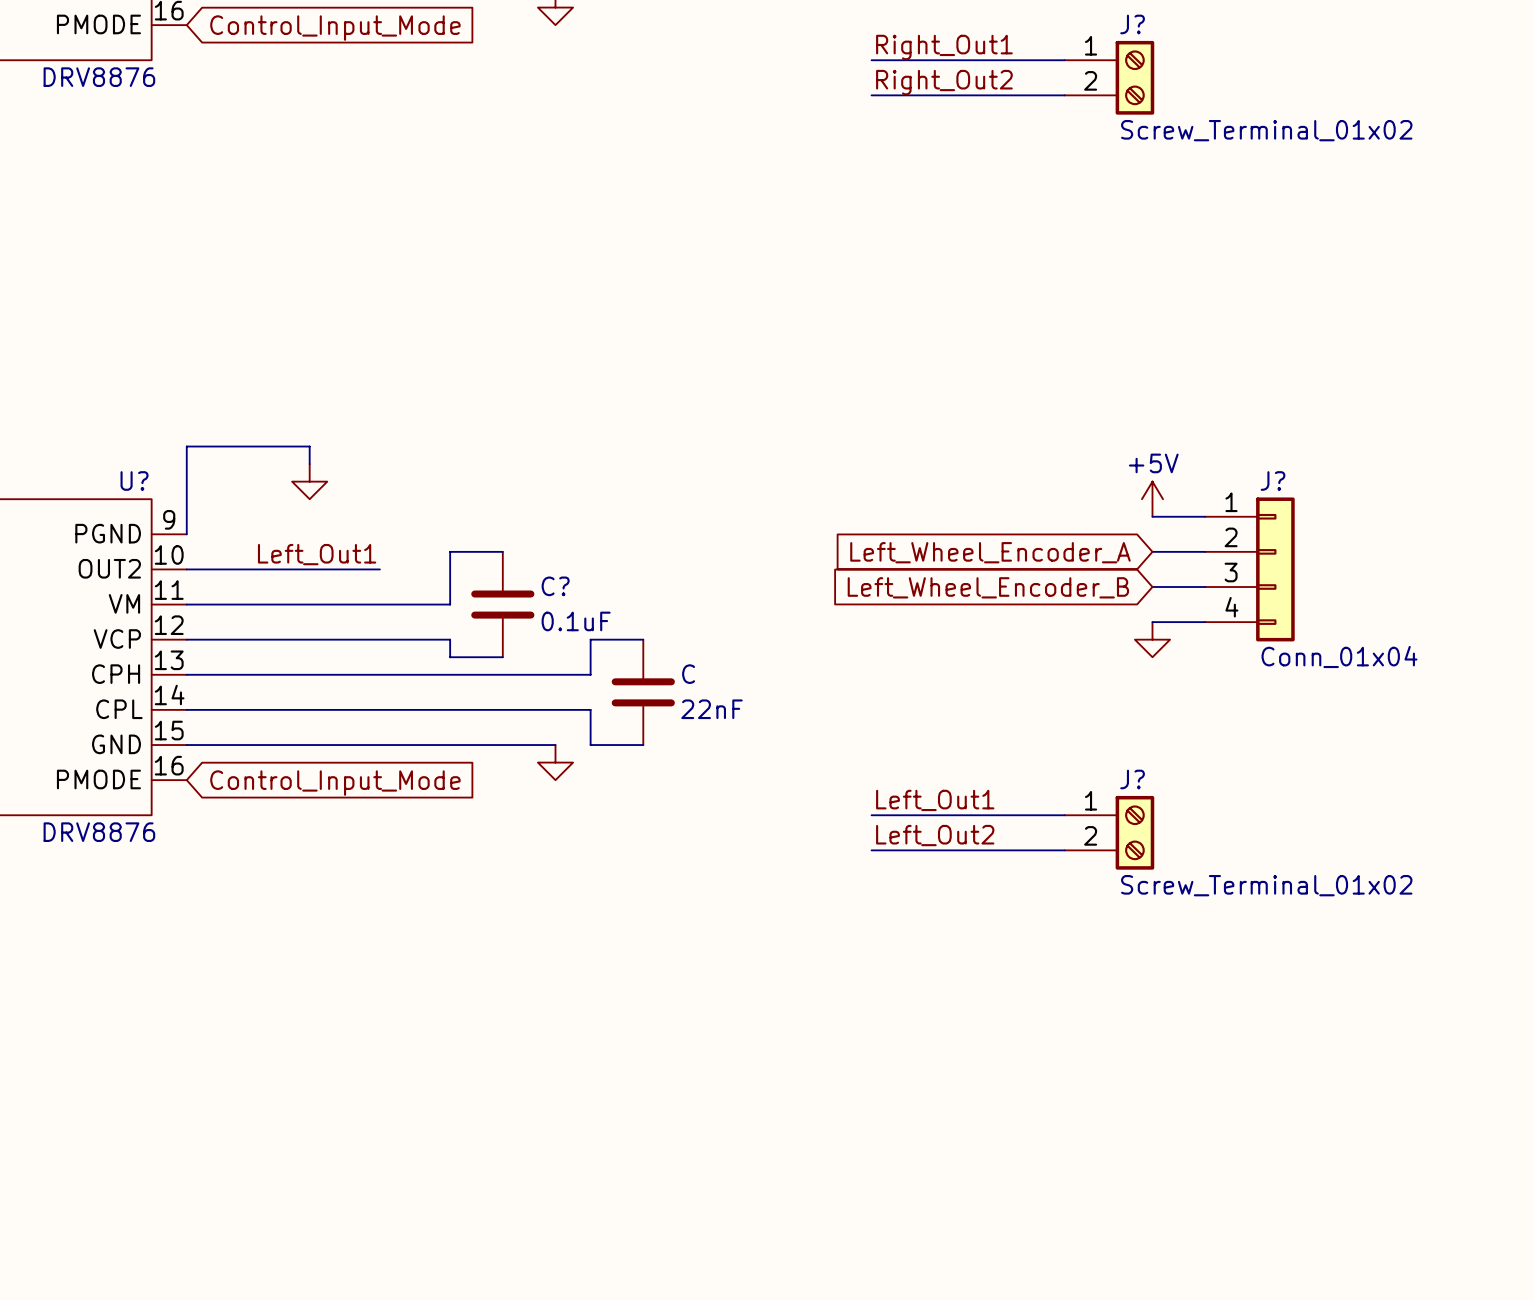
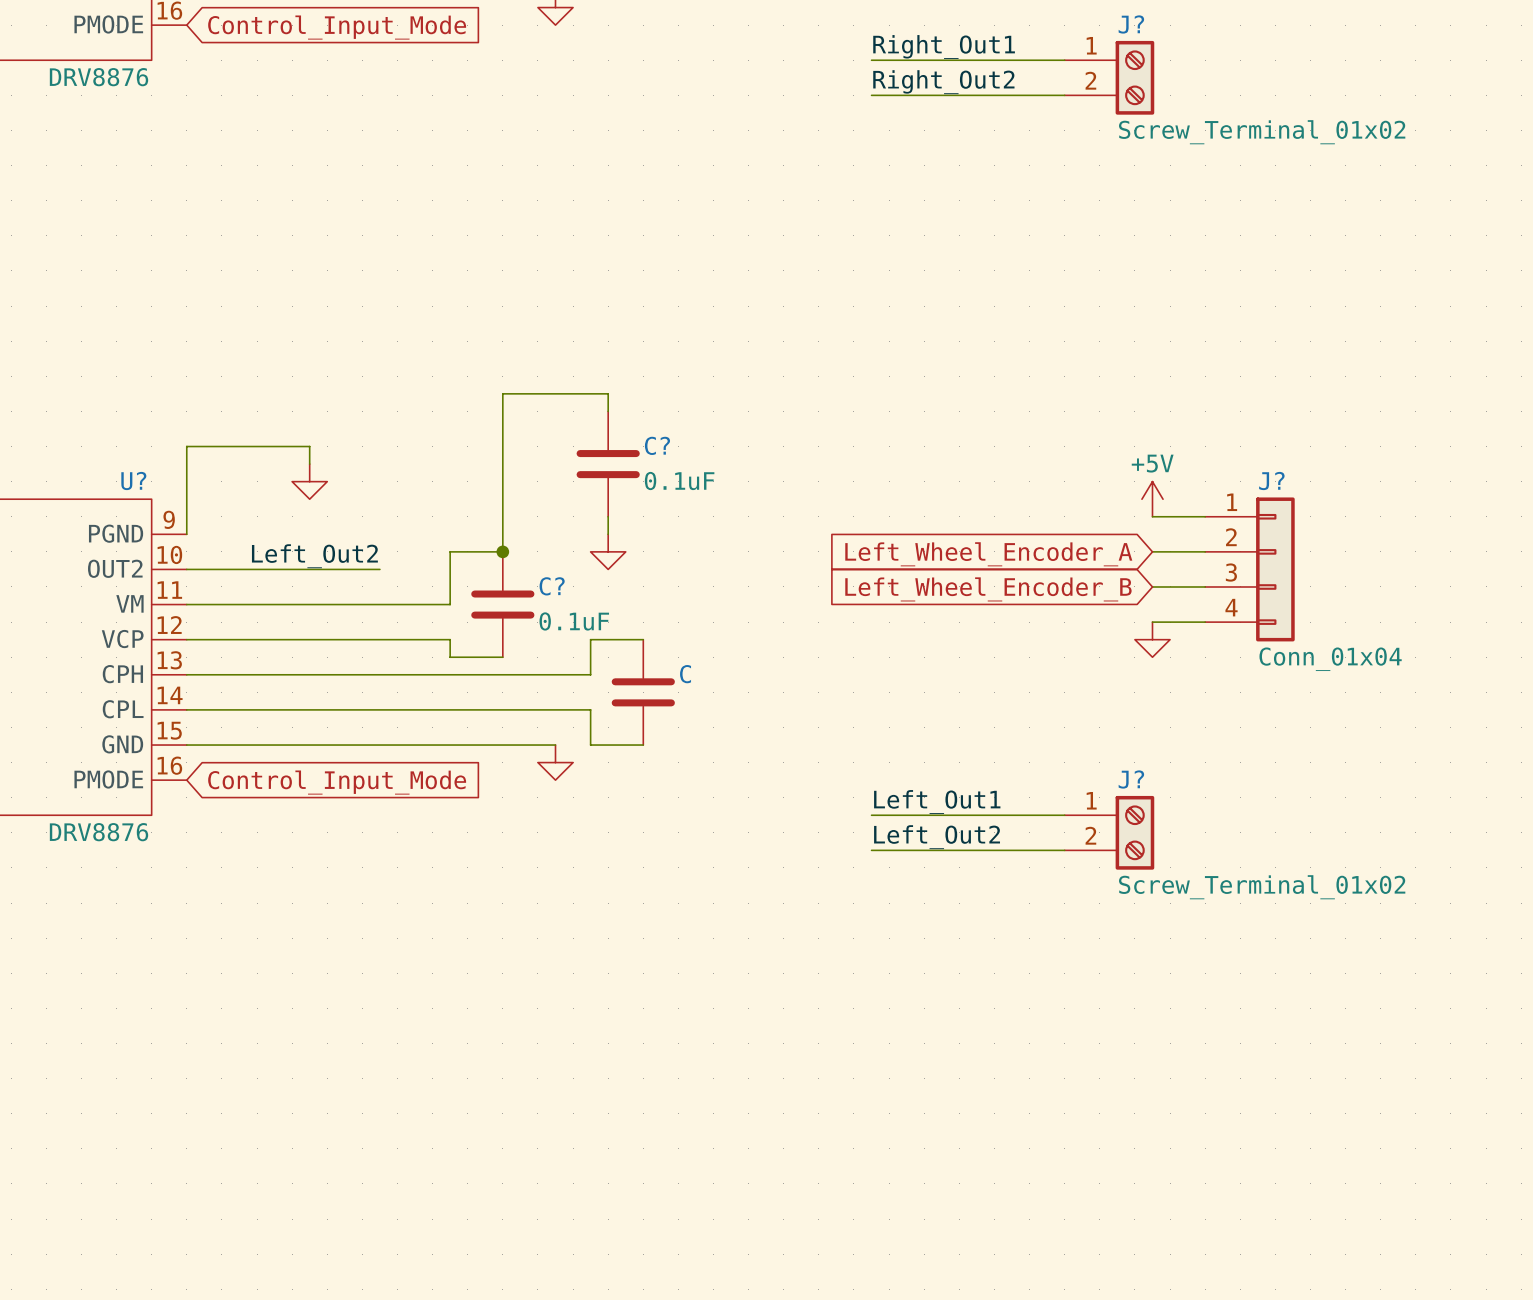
wire: none -> (608, 411) (608, 393) (502, 393) (502, 551)
C?: none -> 0.1uF (608, 464)
wire: none -> (608, 516) (608, 534)
junction: none -> (502, 551)
power symbol: none -> (608, 551)
label: Left_Out1 (317, 554) -> Left_Out2 (314, 556)
C value: 22nF (711, 709) -> none

